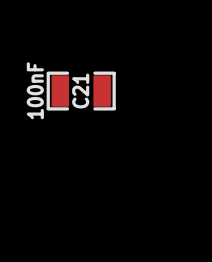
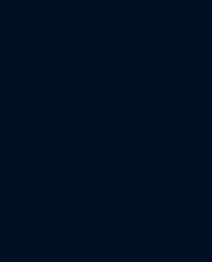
C21: 100nF (81, 91) -> none

